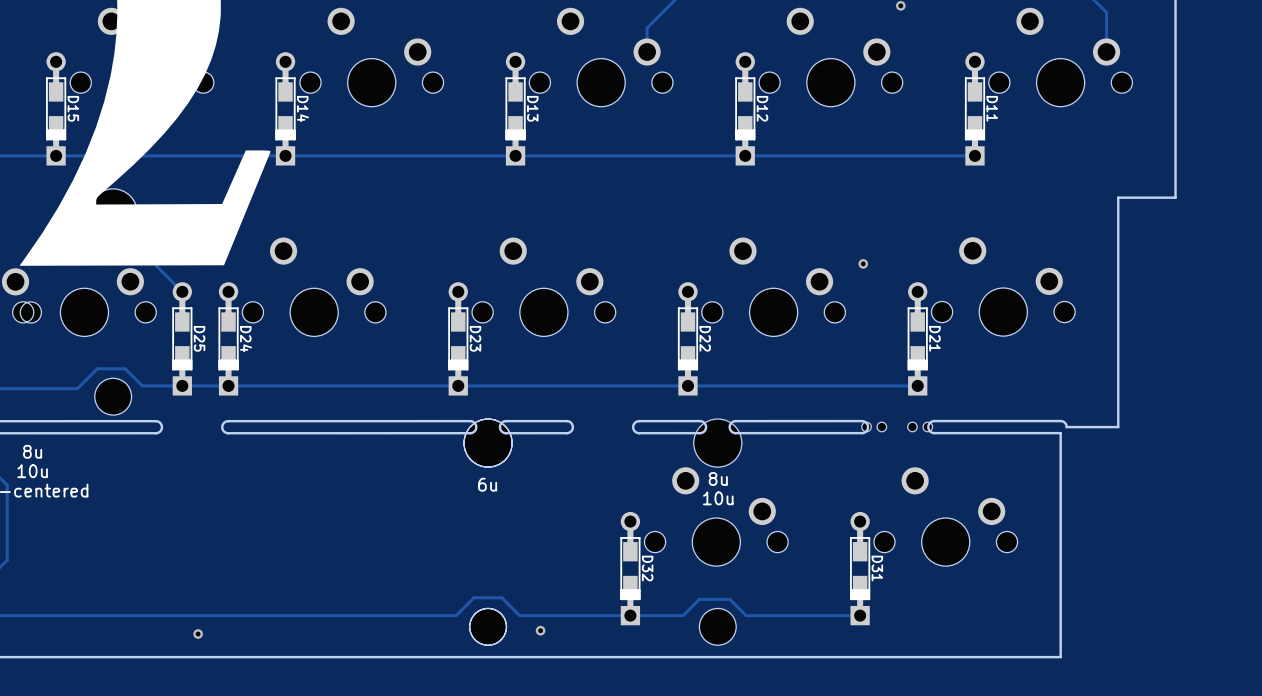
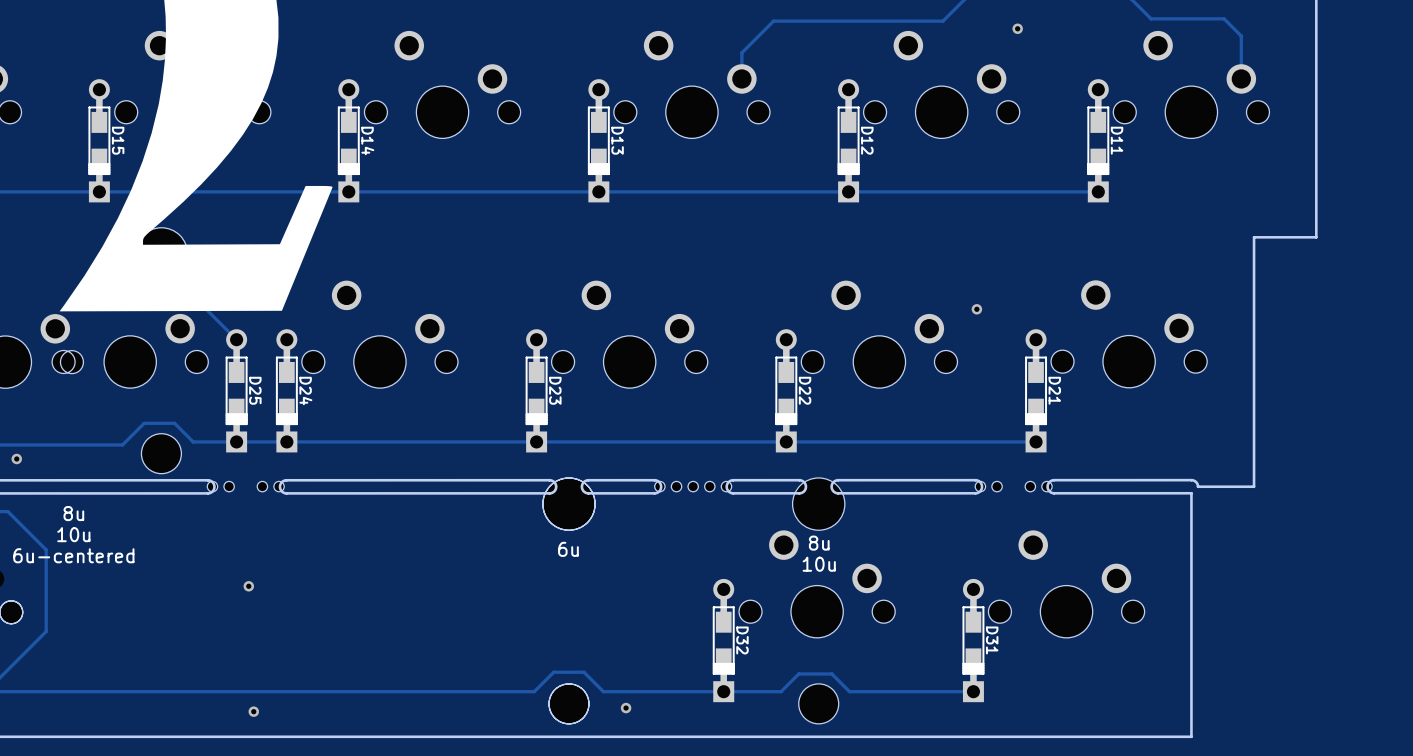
part: none -> (245, 486)
part: none -> (693, 486)
via: none -> (248, 586)

